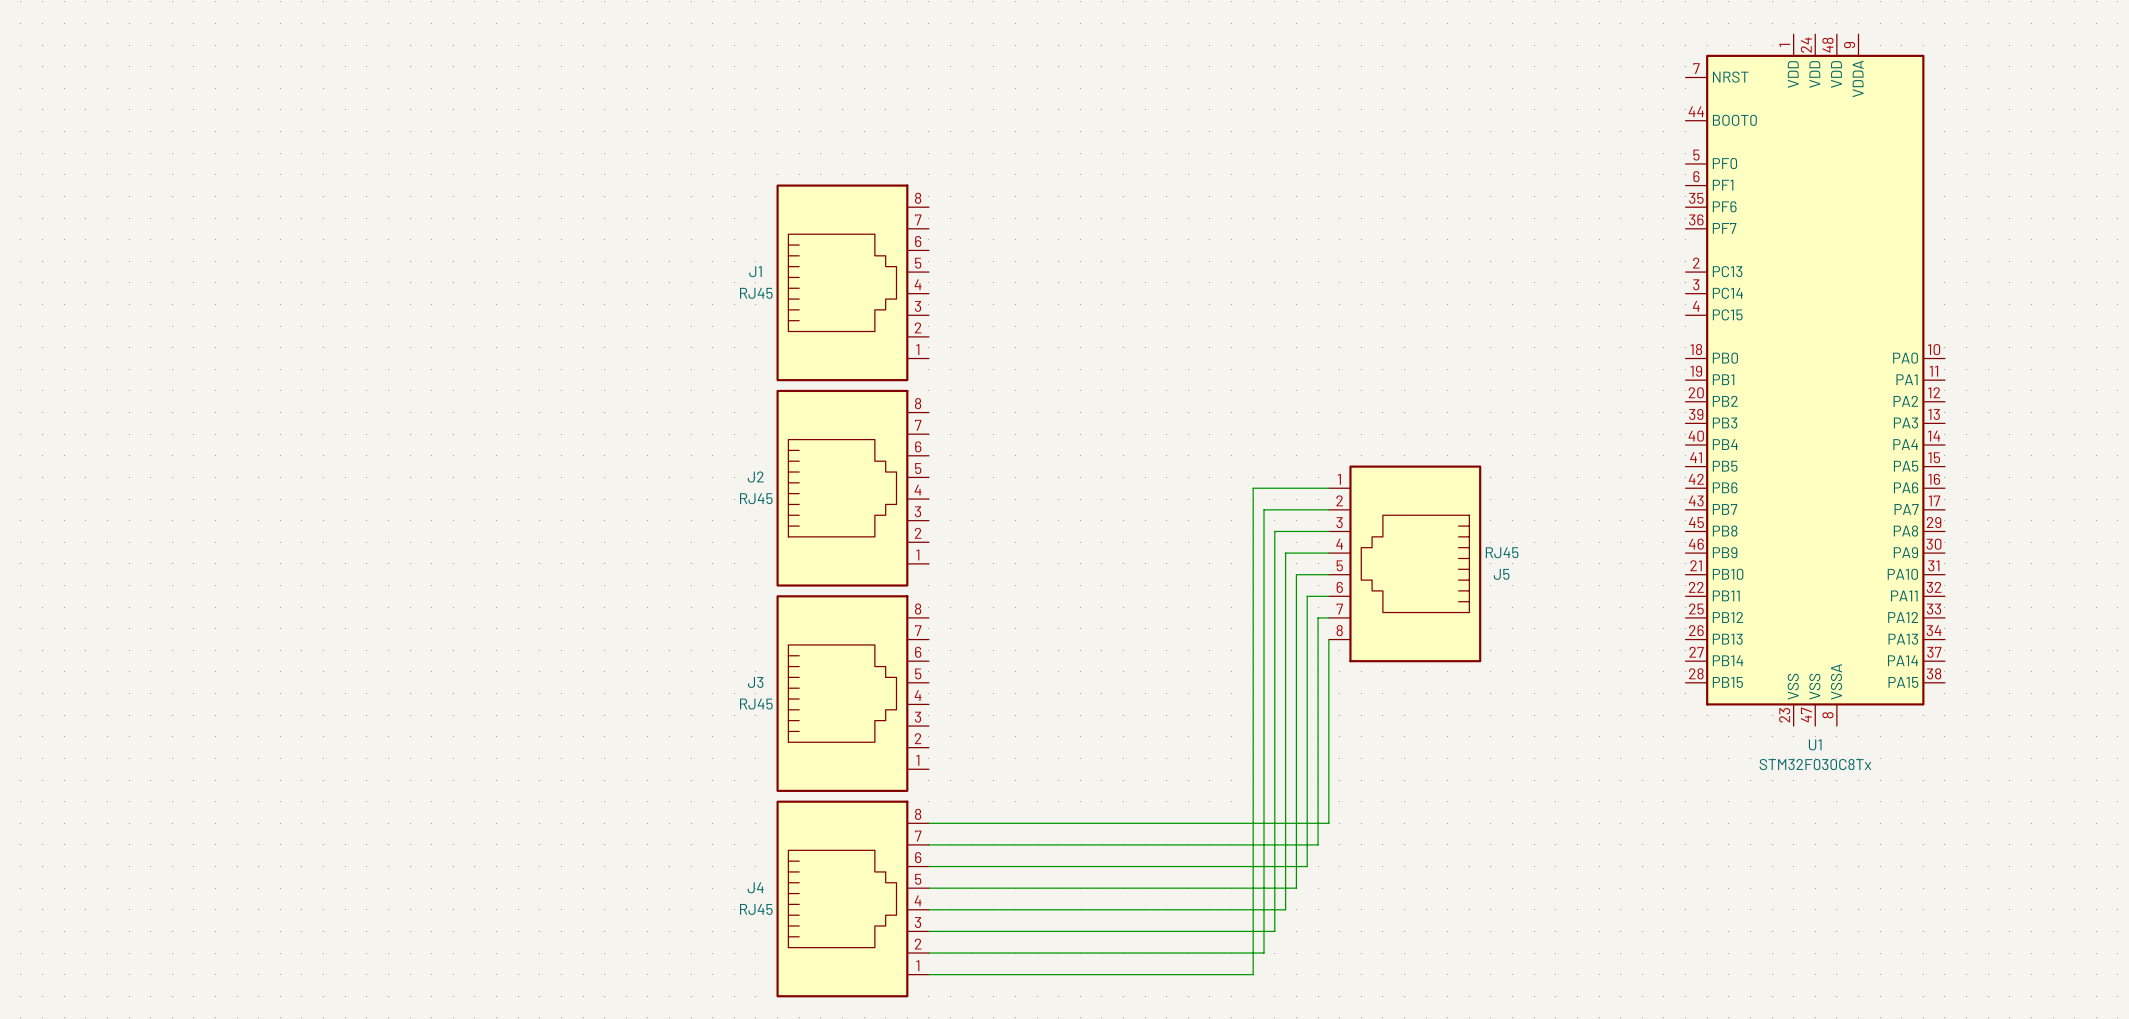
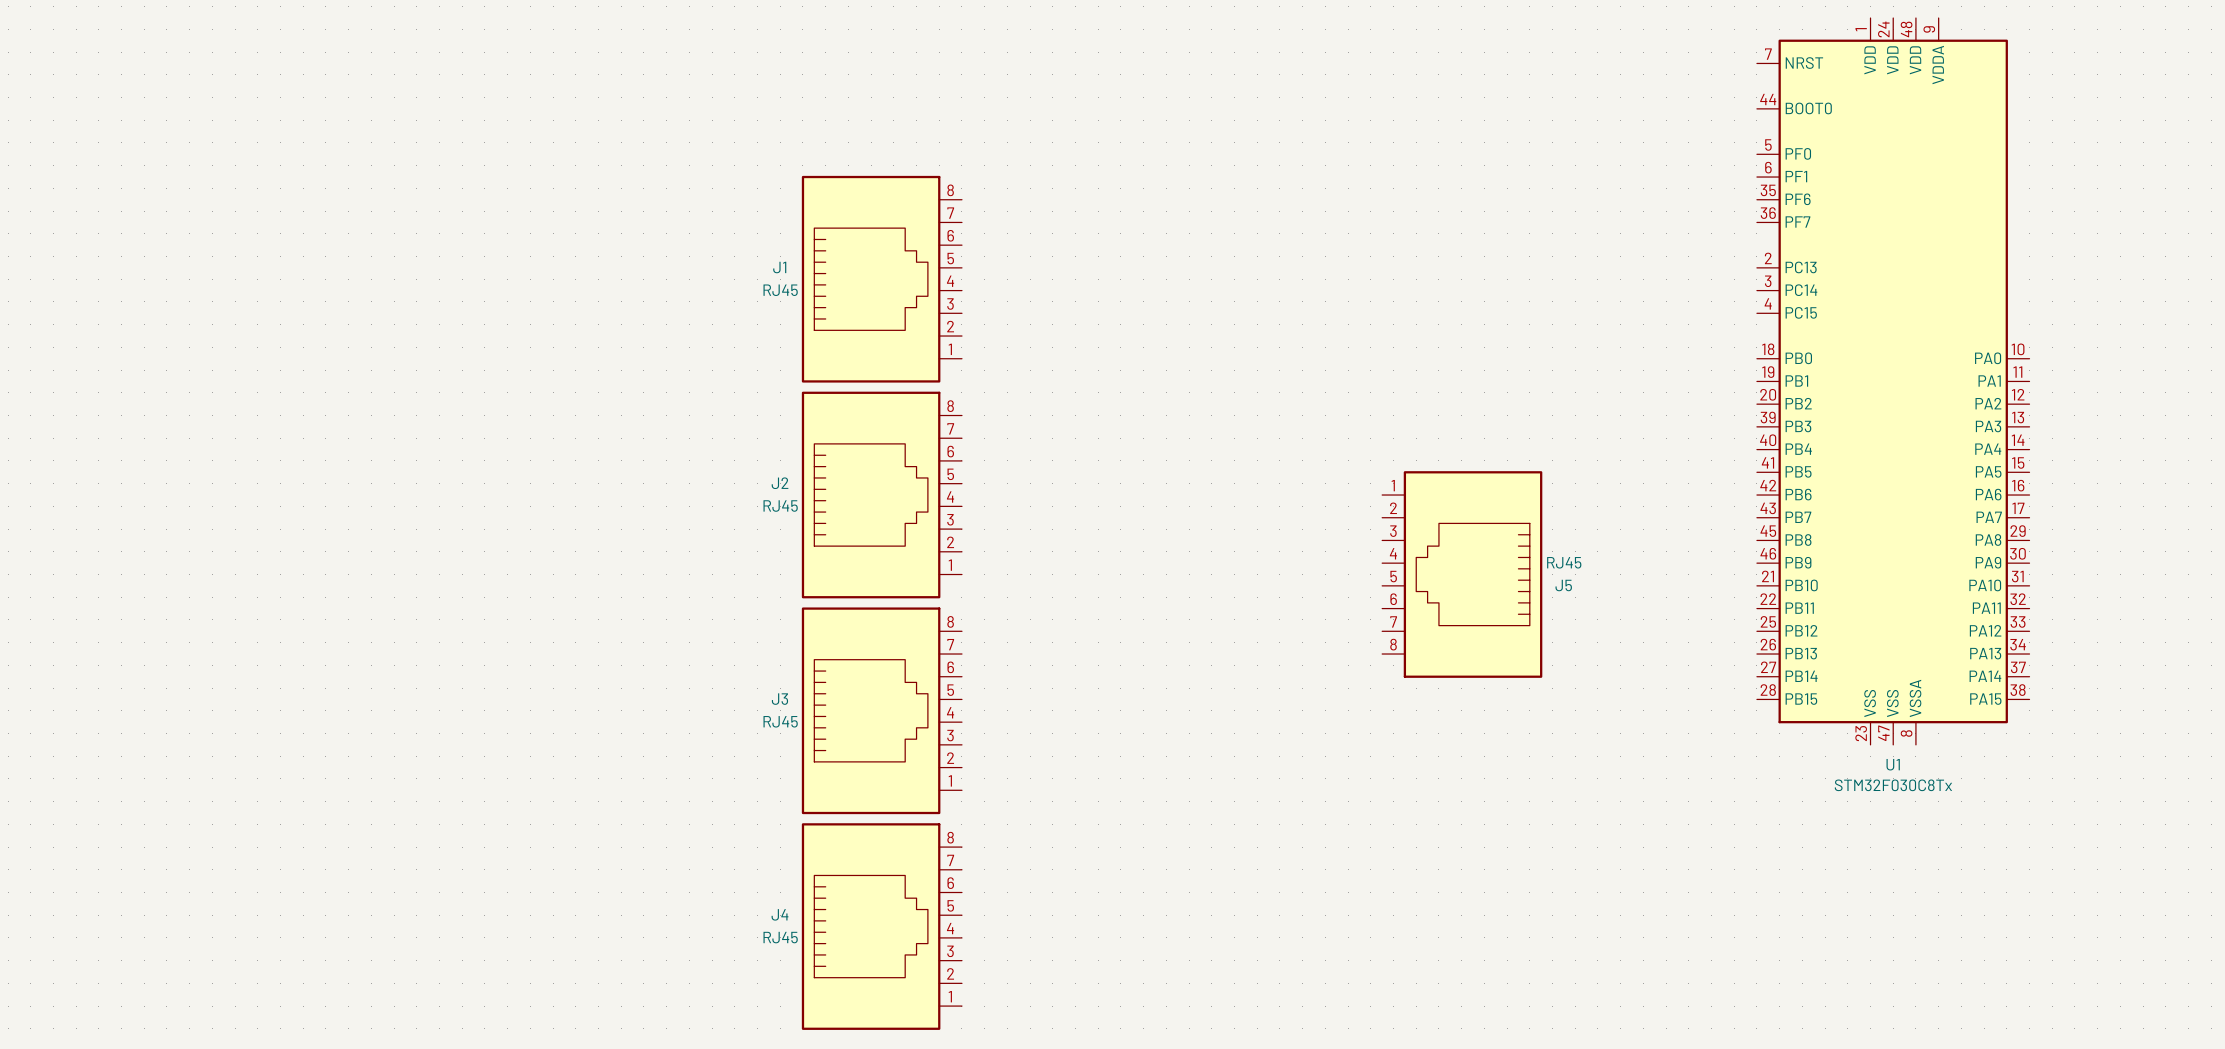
wire: (1328, 488) (1253, 488) (1253, 974) (928, 974) -> none
wire: (1328, 509) (1263, 509) (1263, 953) (928, 953) -> none
wire: (1328, 531) (1274, 531) (1274, 931) (928, 931) -> none
wire: (1328, 553) (1285, 553) (1285, 909) (928, 909) -> none
wire: (1328, 574) (1296, 574) (1296, 888) (928, 888) -> none
wire: (1328, 596) (1307, 596) (1307, 866) (928, 866) -> none
wire: (1328, 617) (1318, 617) (1318, 844) (928, 844) -> none
wire: (1328, 639) (1328, 823) (928, 823) -> none

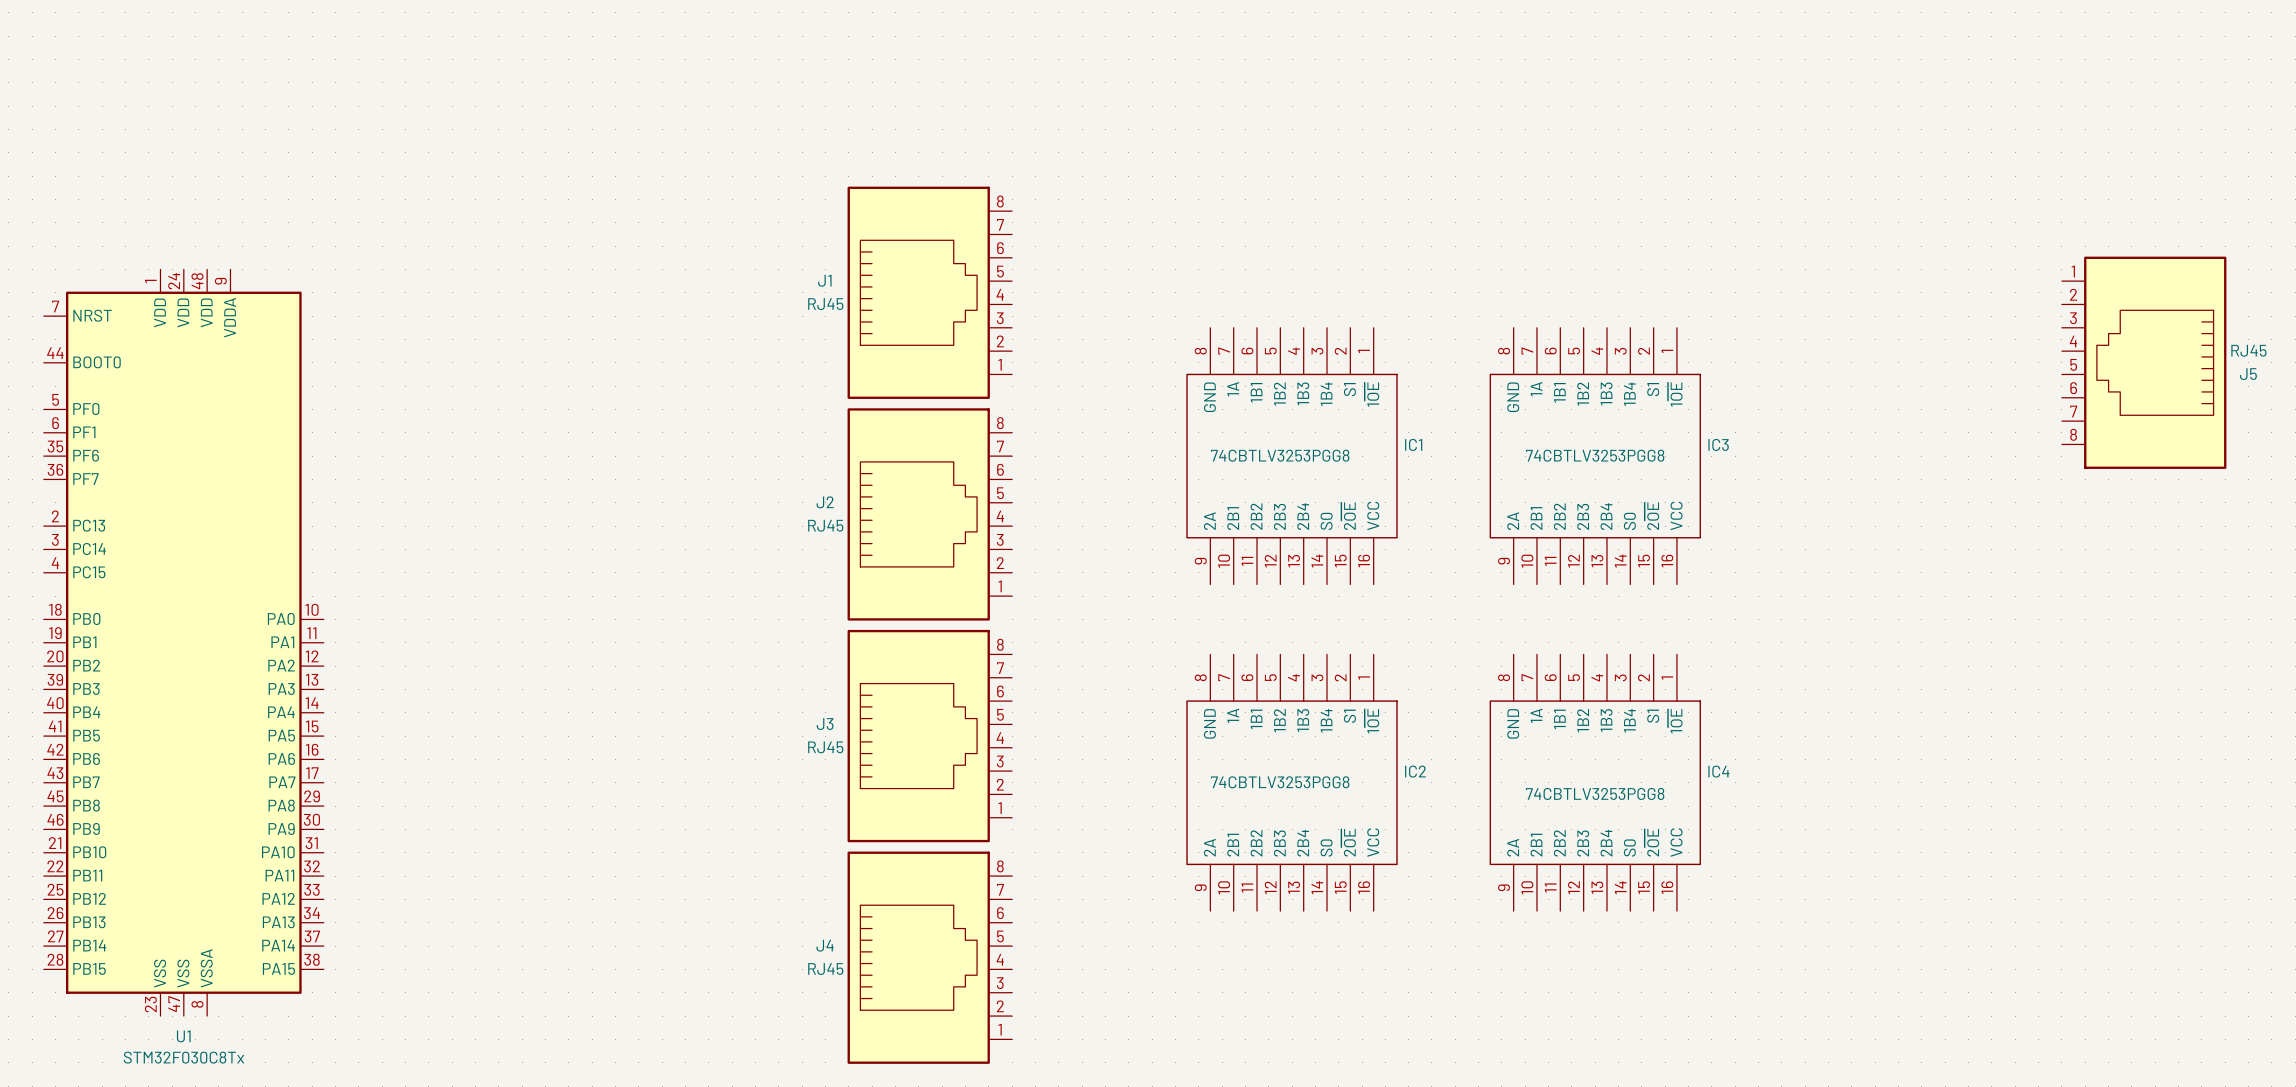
U1 position: (1893, 381) -> (183, 642)
IC1: none -> 74CBTLV3253PGG8 (1292, 456)
IC3: none -> 74CBTLV3253PGG8 (1595, 456)
J5 position: (1462, 574) -> (2144, 362)
IC2: none -> 74CBTLV3253PGG8 (1292, 782)
IC4: none -> 74CBTLV3253PGG8 (1595, 782)

